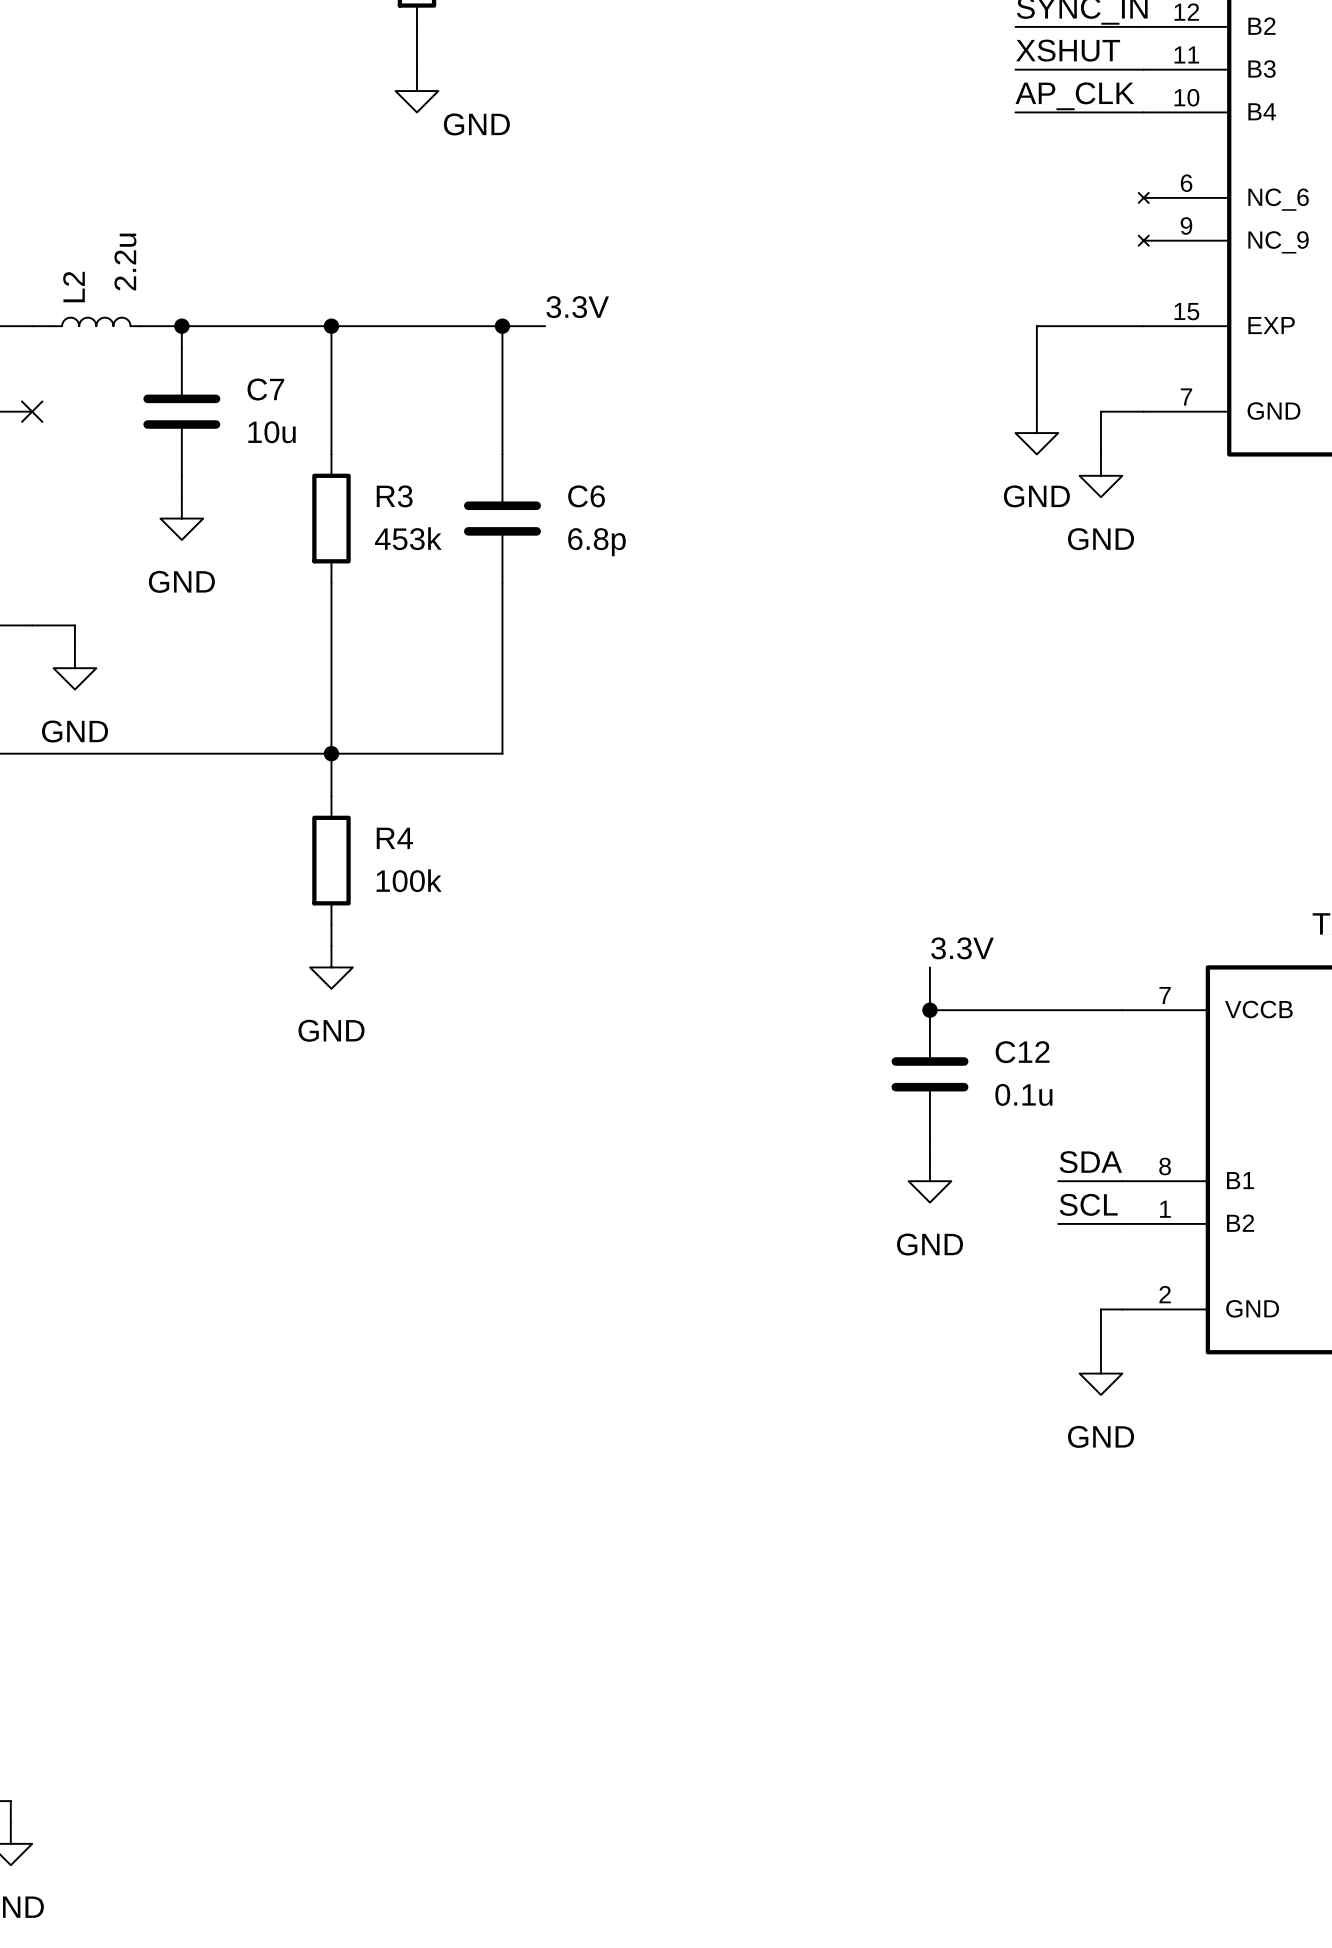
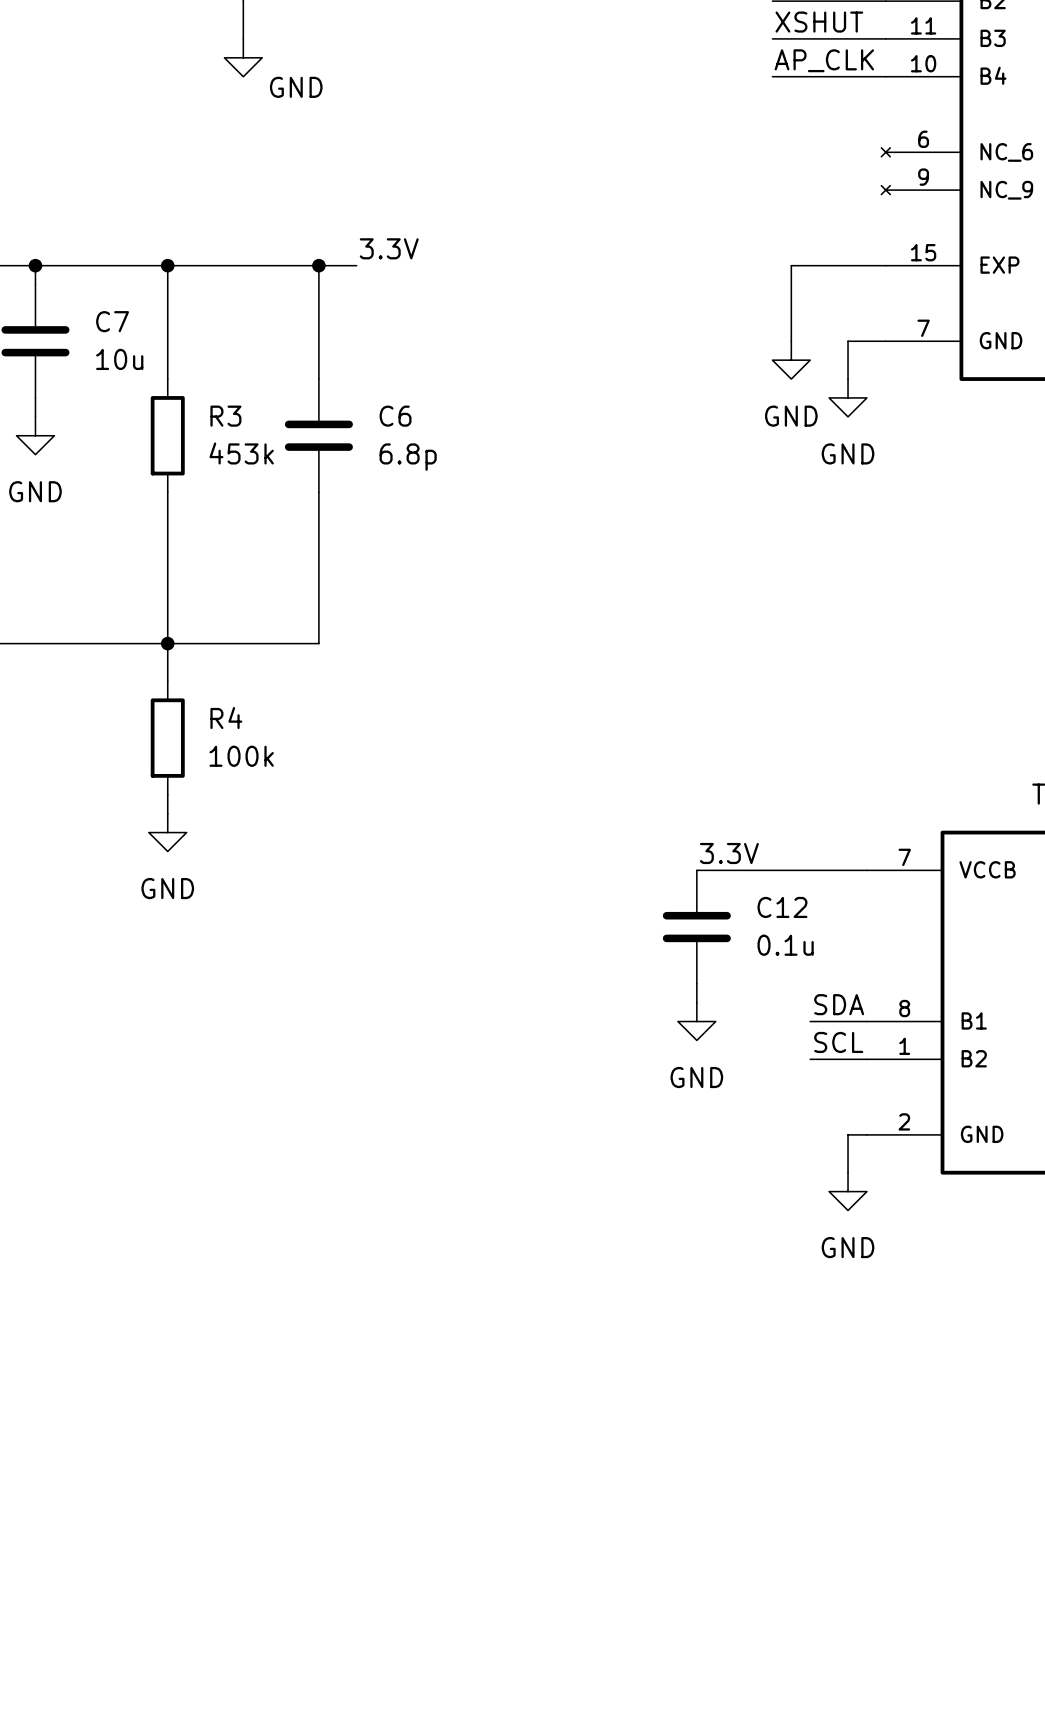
label position: 3.3V (962, 948) -> 3.3V (729, 853)
wire: (929, 967) (929, 1010) -> none
junction: (929, 1010) -> none

